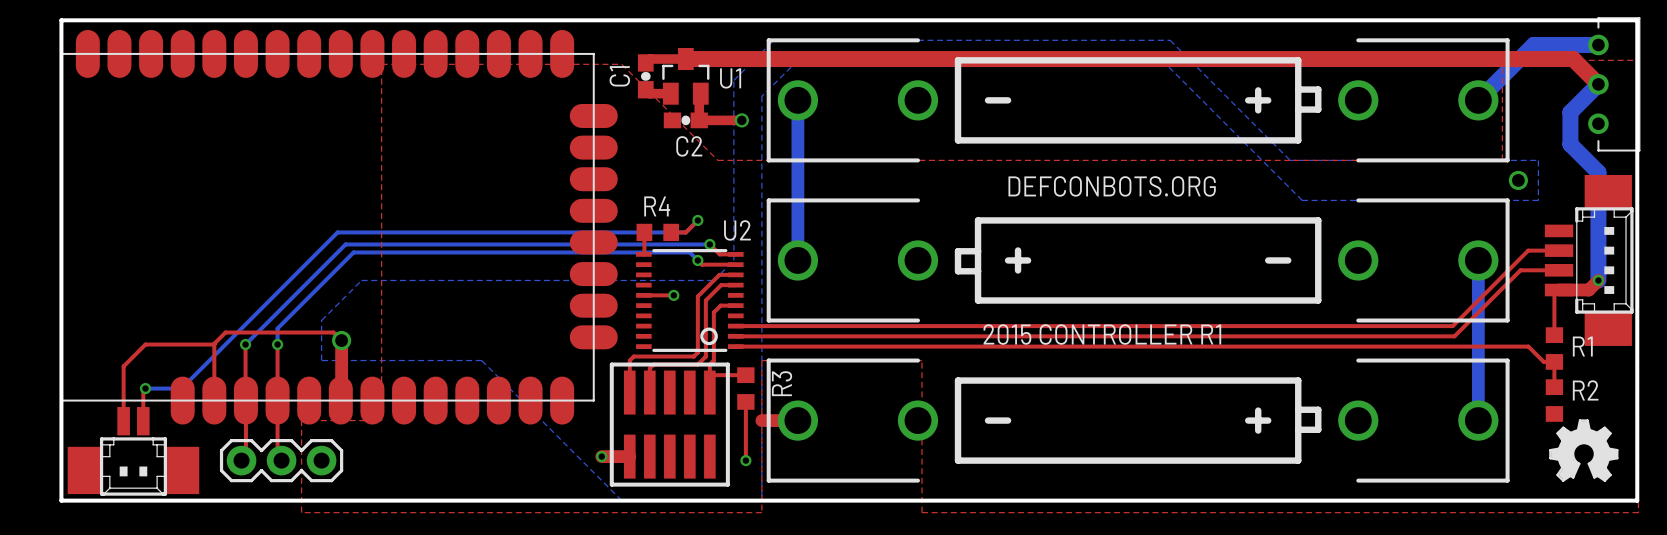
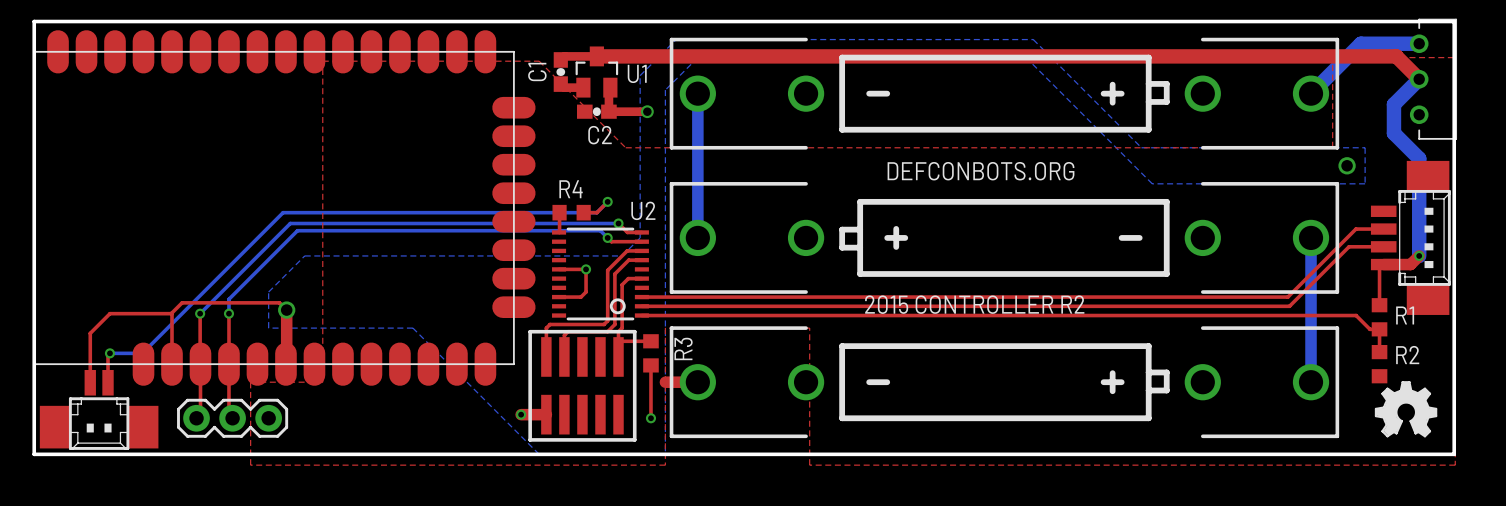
top track: none -> (586, 269) (586, 292) (581, 297) (559, 297)
text: 2015 CONTROLLER R1 (1102, 334) -> 2015 CONTROLLER R2 (974, 304)

